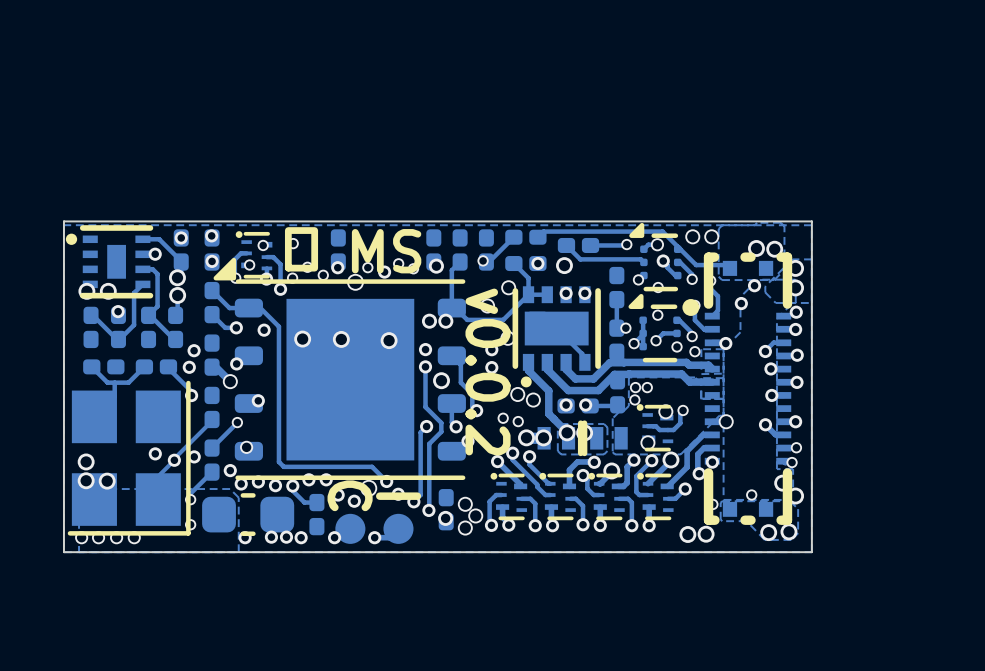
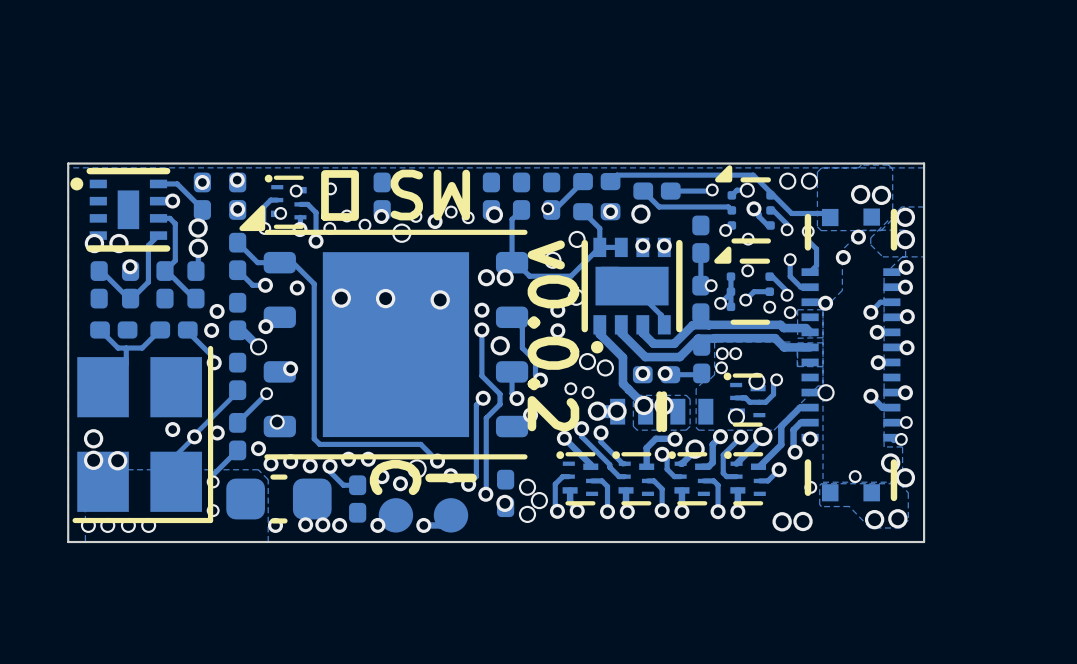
text rotation: 0° (386, 251) -> 180° (430, 195)
part footprint: [682, 252, 793, 525] -> [801, 208, 901, 502]

